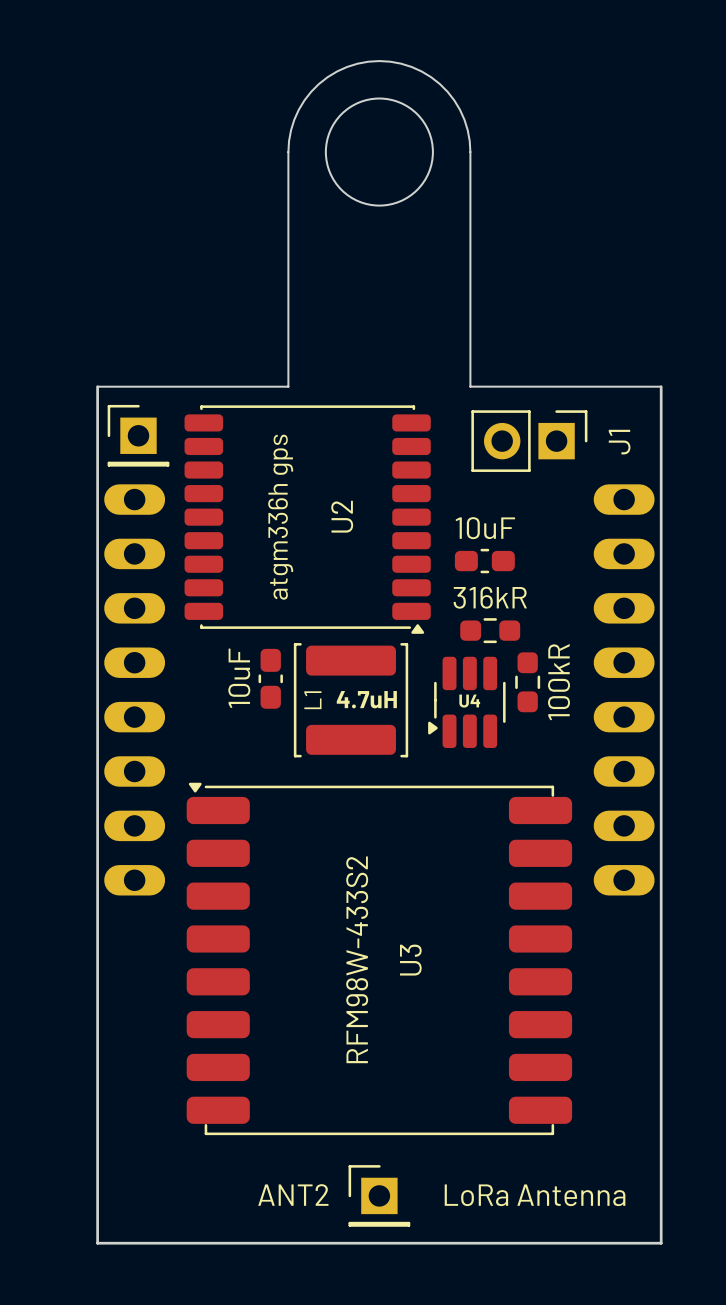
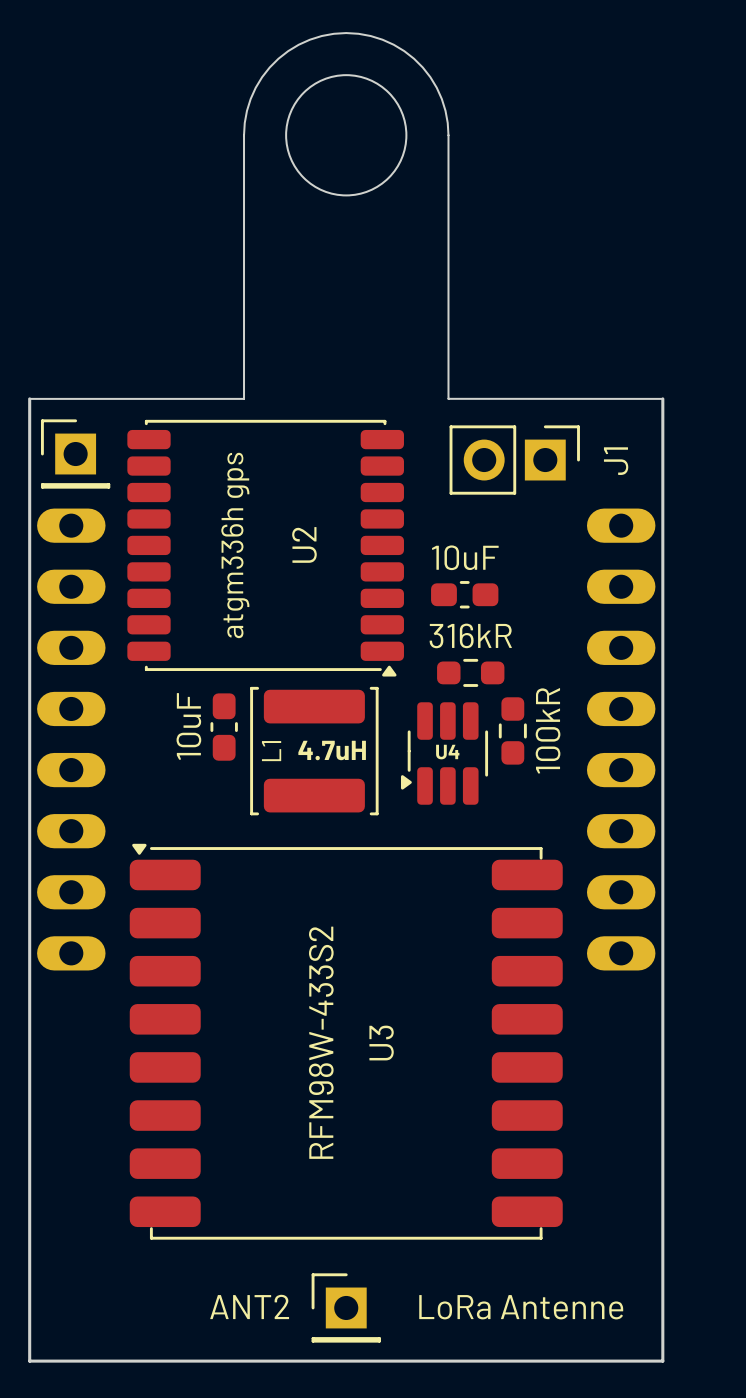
ANT2 value: LoRa Antenna (535, 1195) -> LoRa Antenne (521, 1307)

